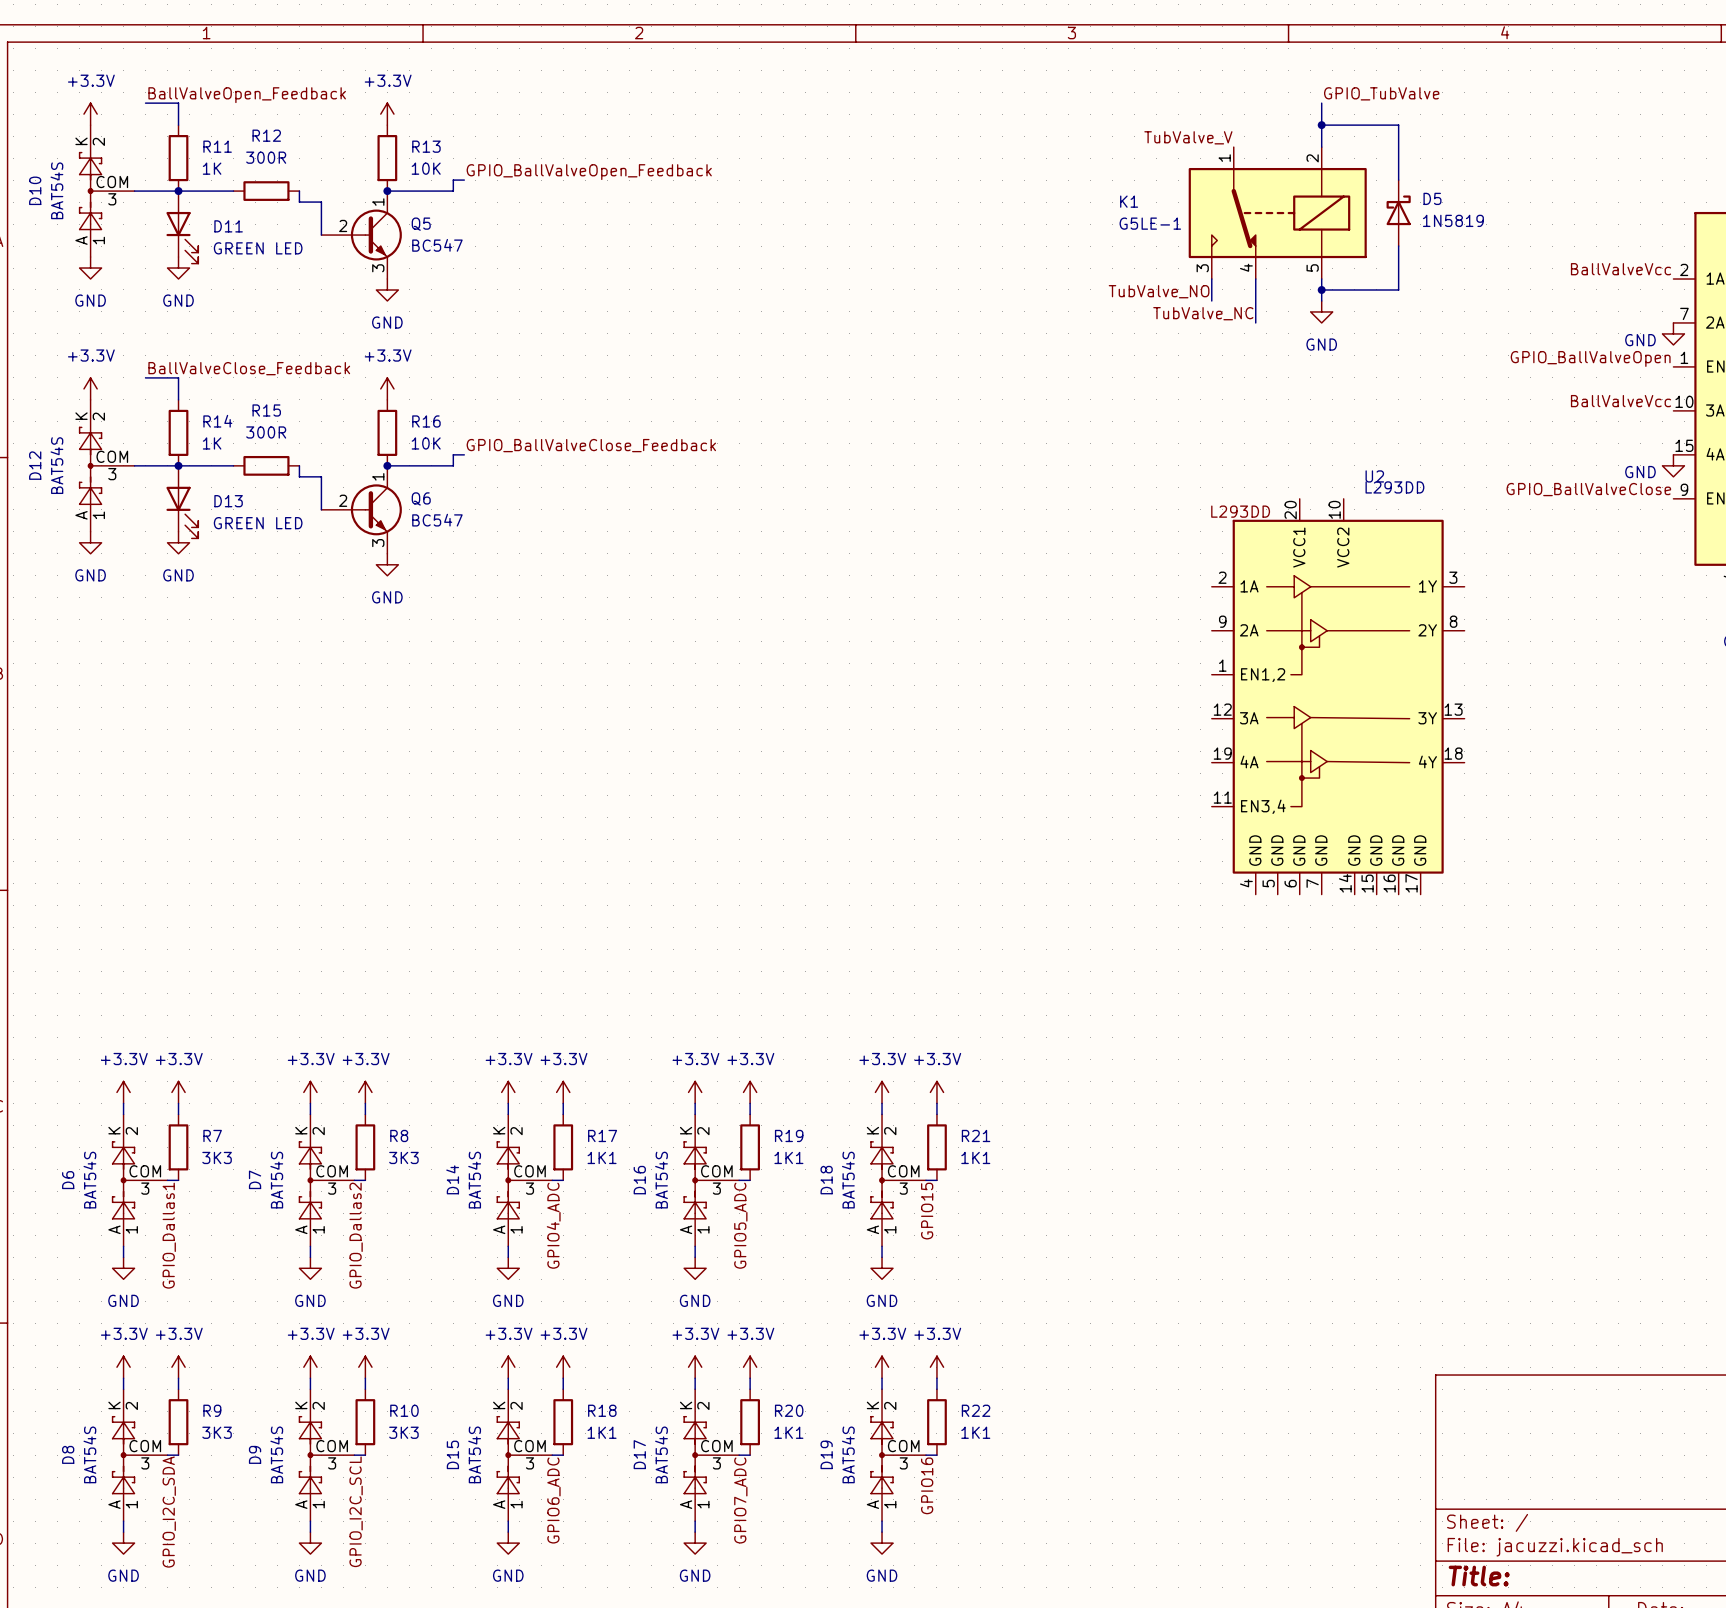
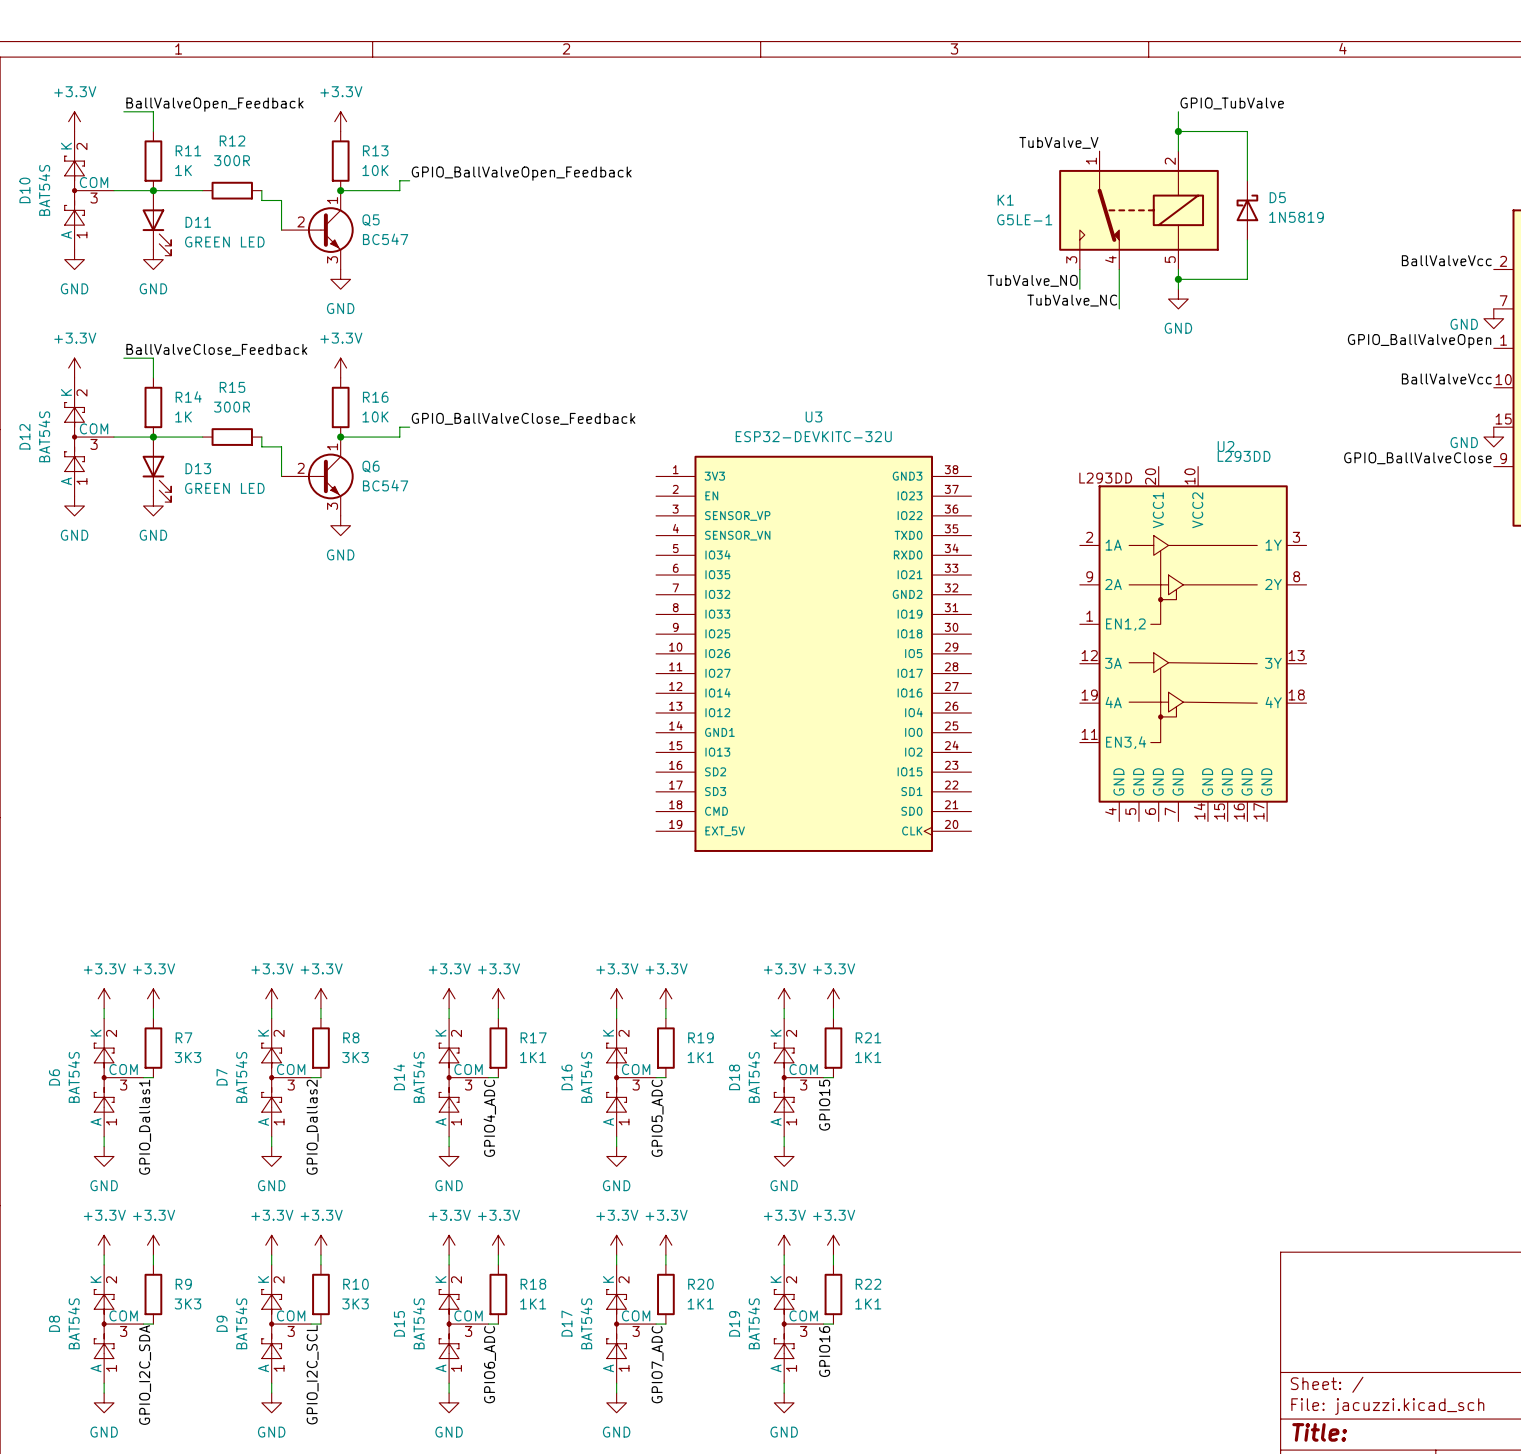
U3: none -> ESP32-DEVKITC-32U (813, 653)

